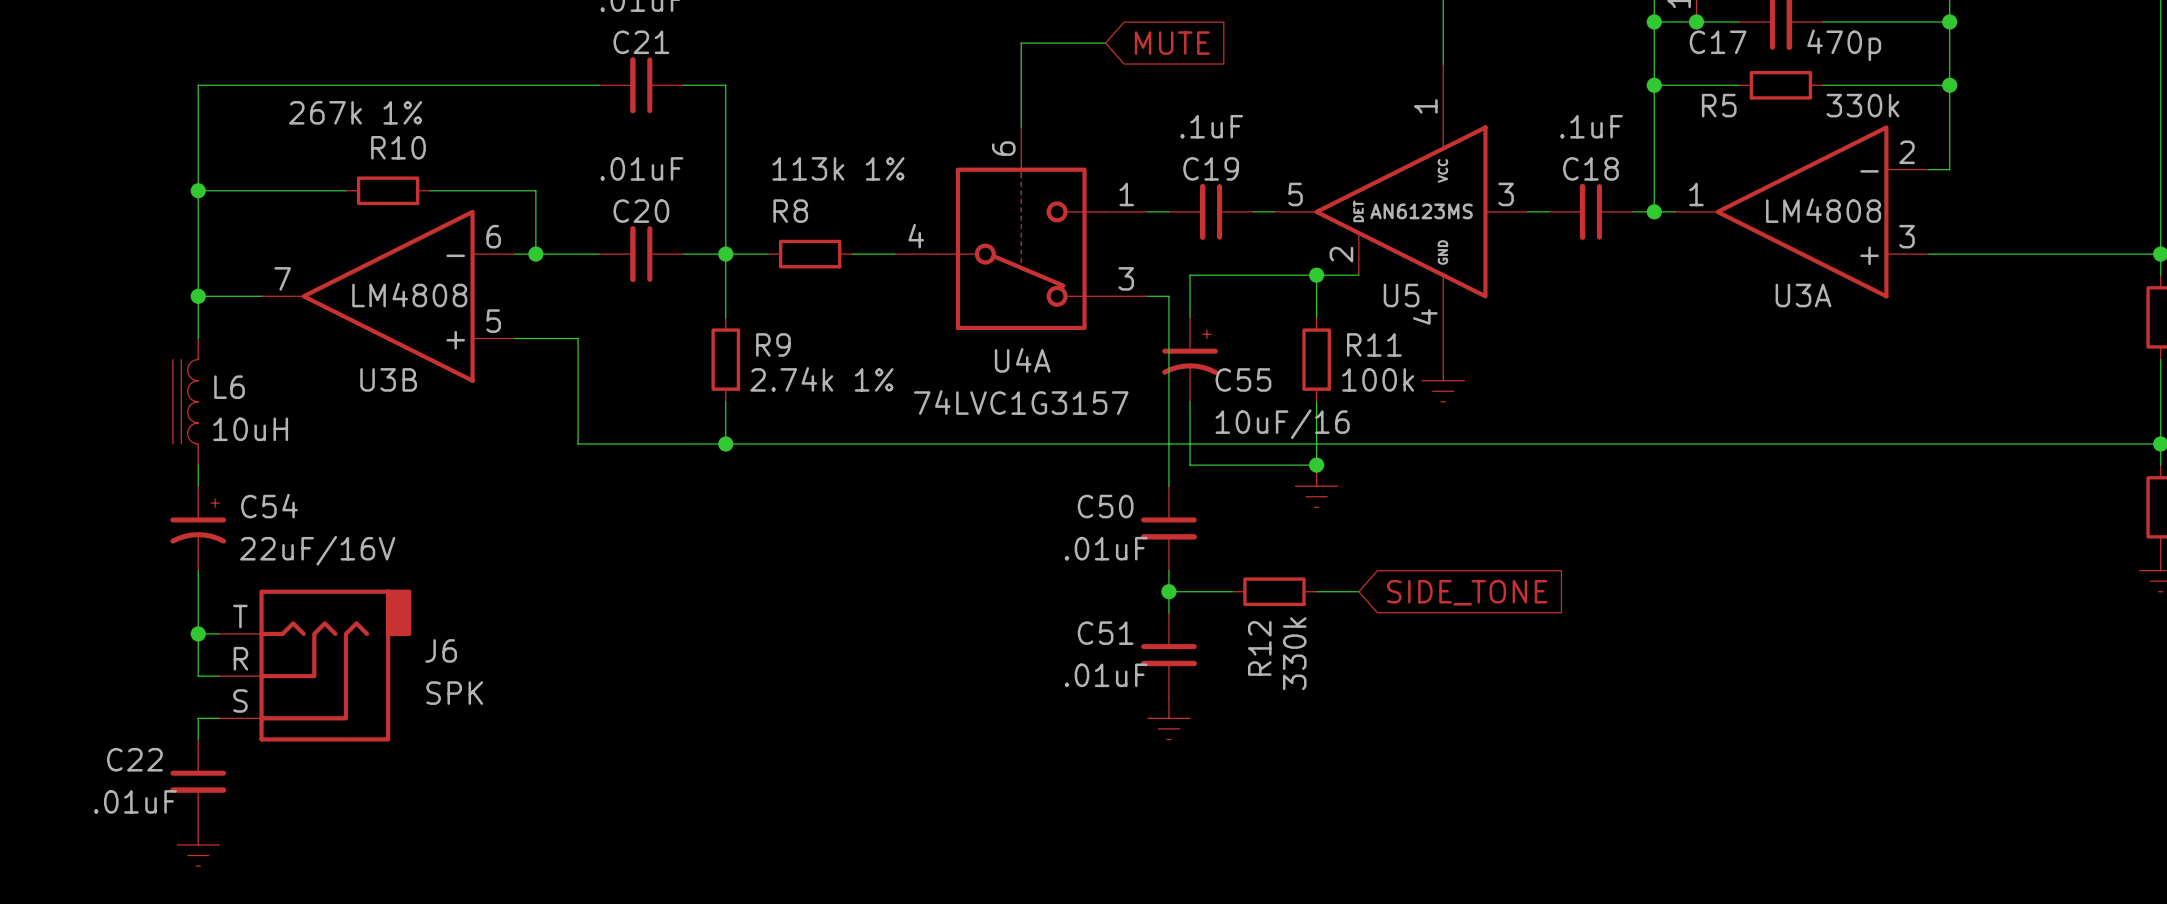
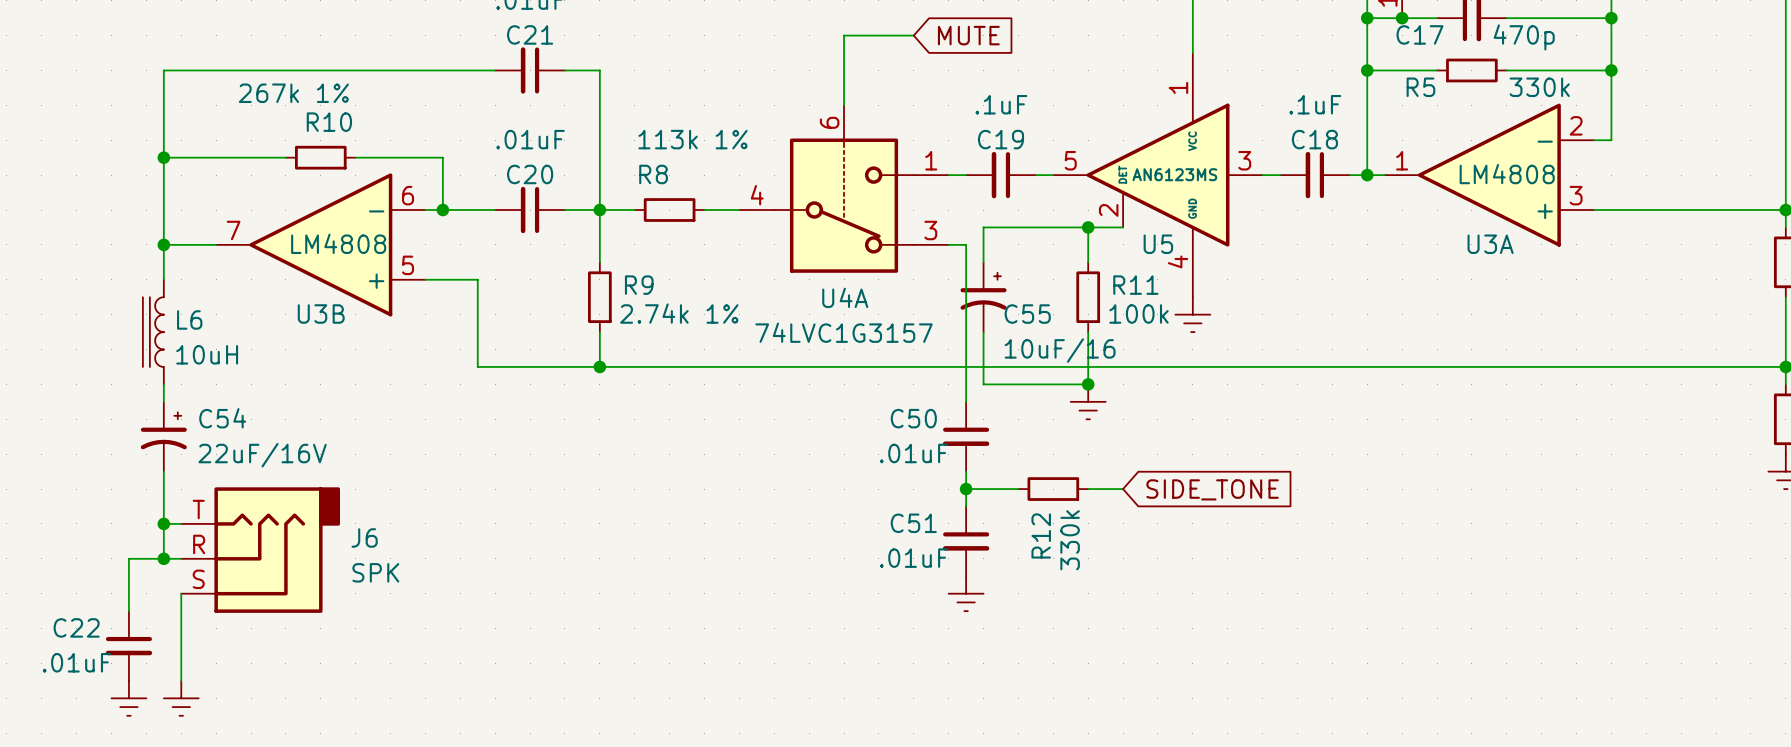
wire: none -> (163, 558) (128, 558) (128, 611)
junction: none -> (163, 558)
wire: (219, 718) (198, 718) (198, 739) -> (181, 593) (181, 680)
C22 position: (198, 781) -> (128, 646)
power symbol: none -> (128, 698)
power symbol: (198, 844) -> none
power symbol: none -> (181, 698)

